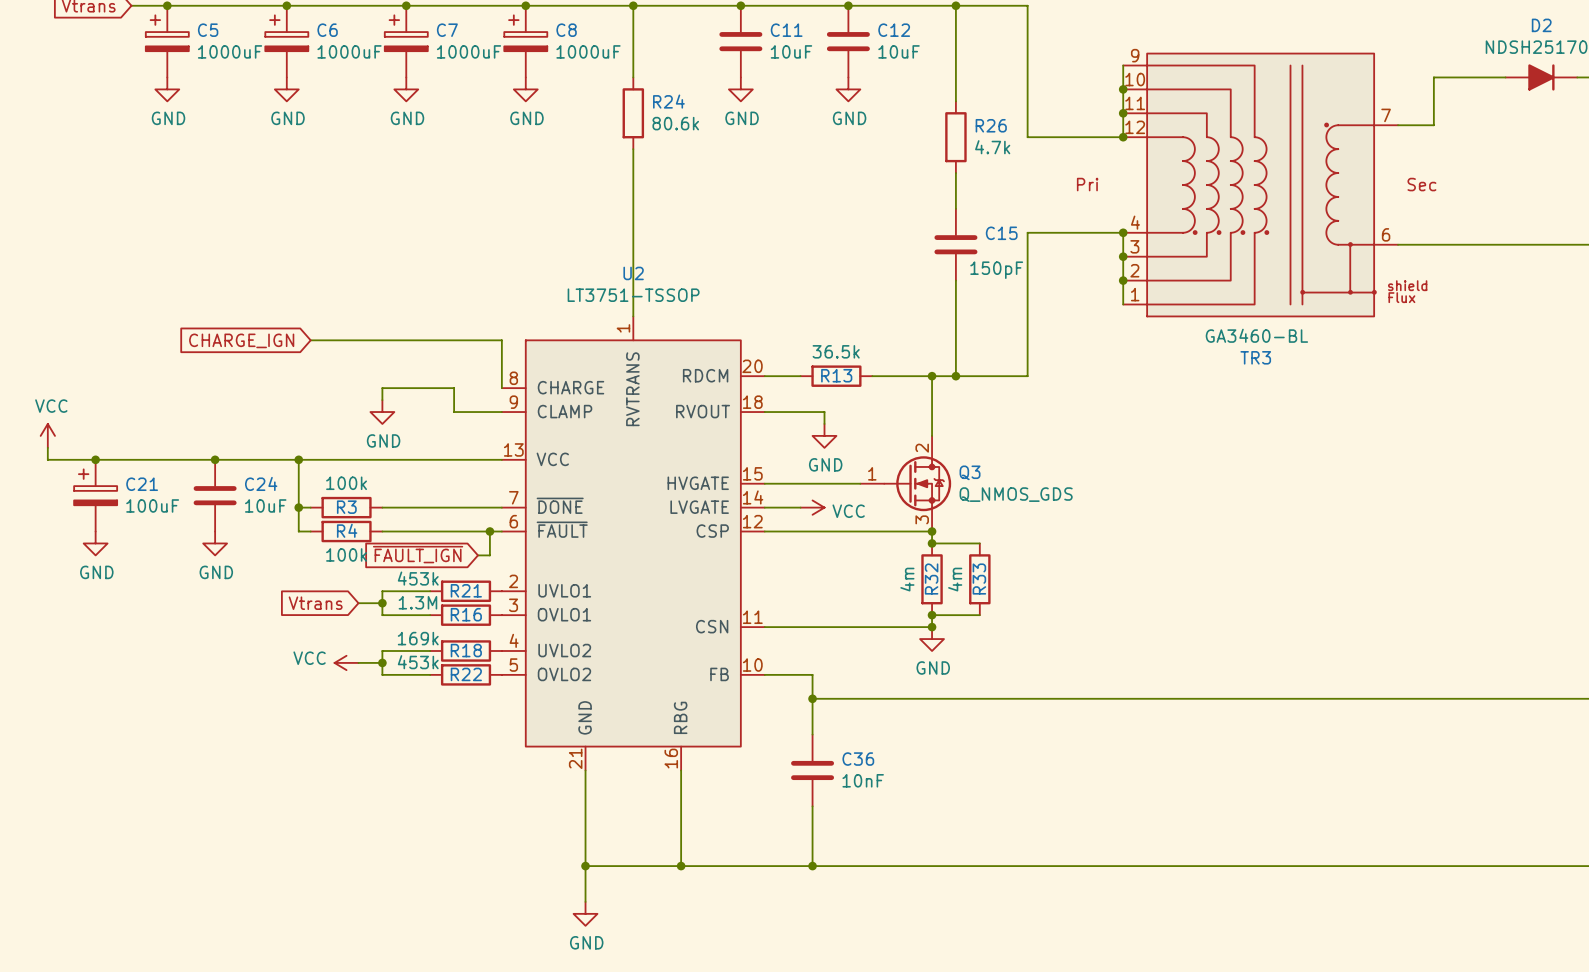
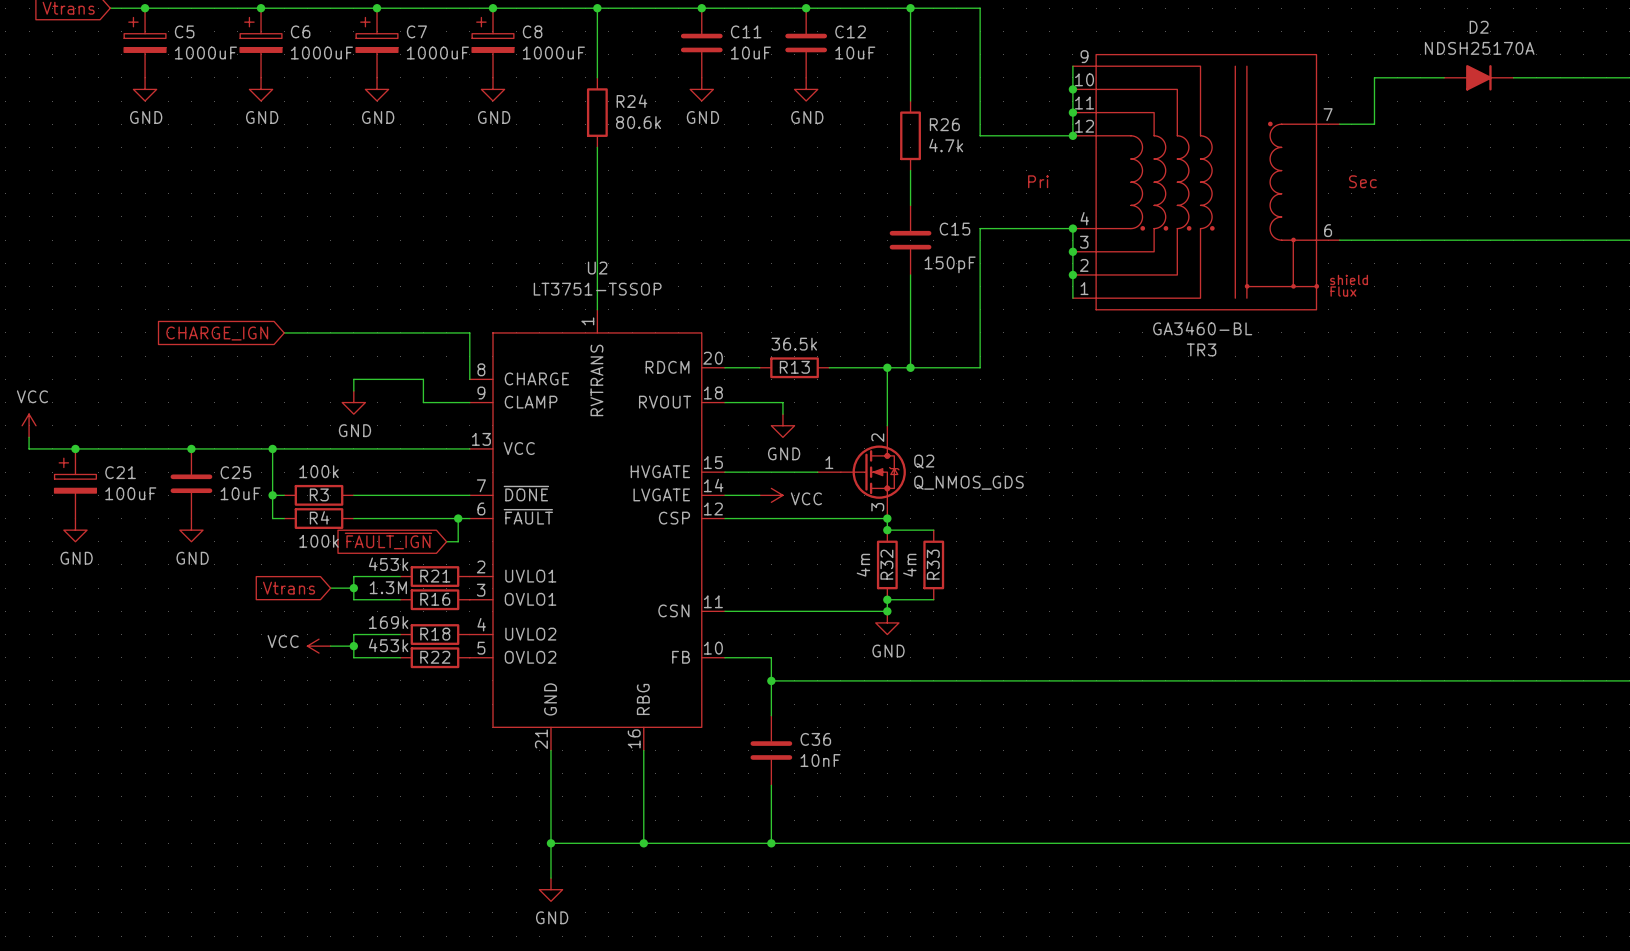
Q3 name: Q3 (970, 472) -> Q2 (924, 461)
C24 name: C24 (261, 483) -> C25 (235, 472)

